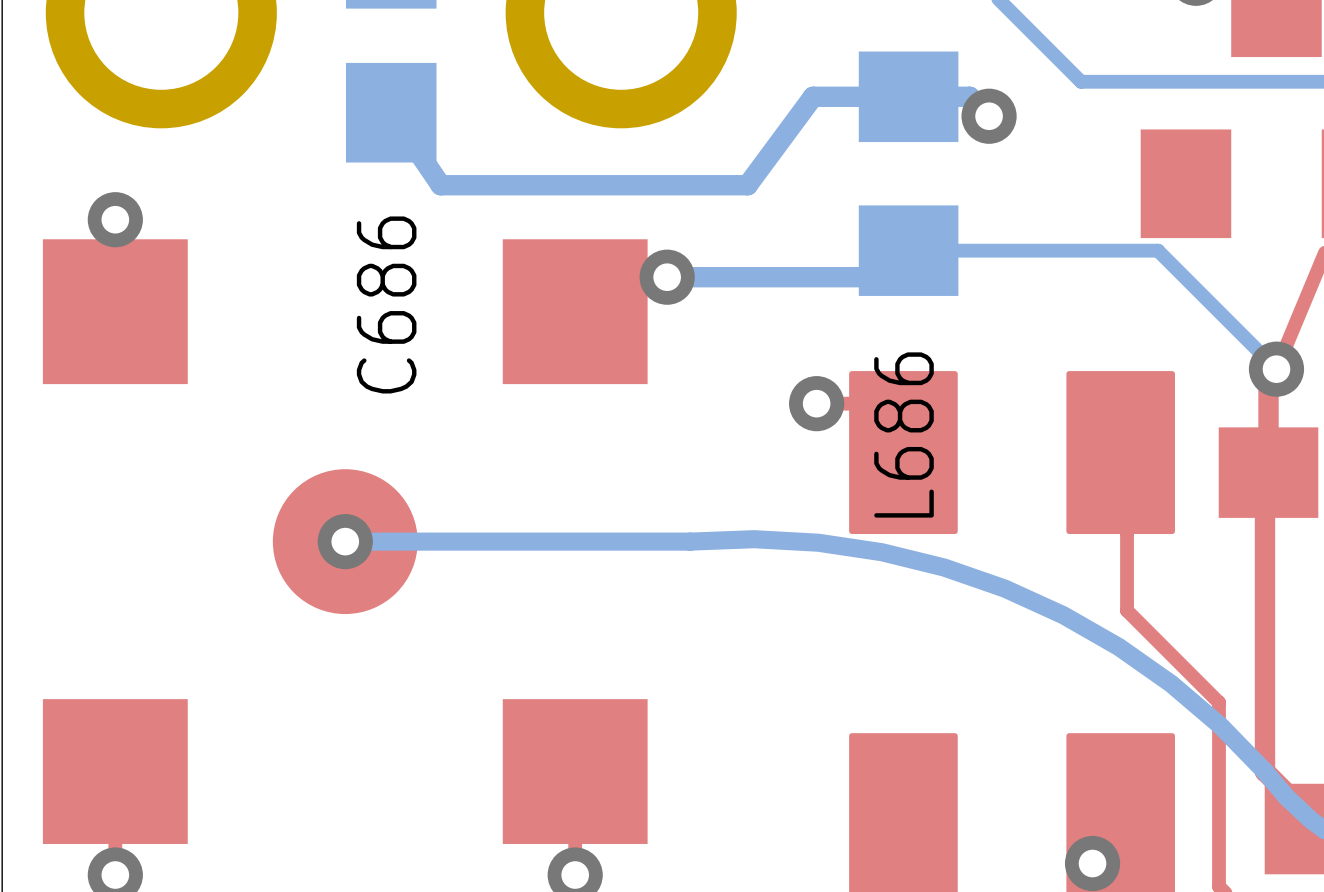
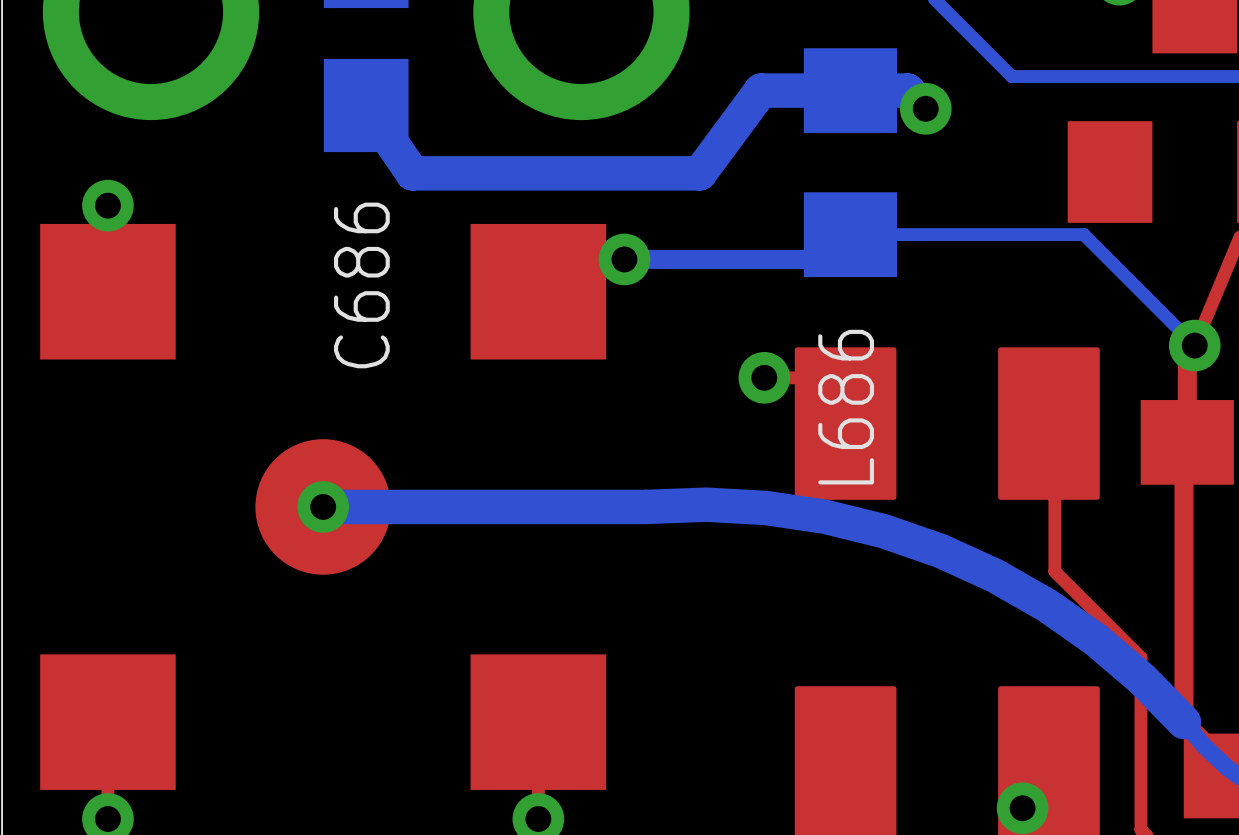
bottom track width: thin (391, 112) (440, 185) (747, 185) (813, 96) (969, 96) (989, 116) -> thick (366, 105) (412, 173) (699, 173) (761, 90) (907, 90) (925, 108)
bottom track width: thin (345, 541) (690, 541) (754, 539) (818, 542) (881, 552) (944, 567) (1004, 588) (1063, 615) (1118, 647) (1171, 683) (1220, 725) (1264, 771) -> thick (323, 506) (645, 506) (706, 504) (765, 507) (825, 516) (883, 531) (940, 550) (995, 575) (1047, 605) (1096, 640) (1142, 679) (1184, 722)

